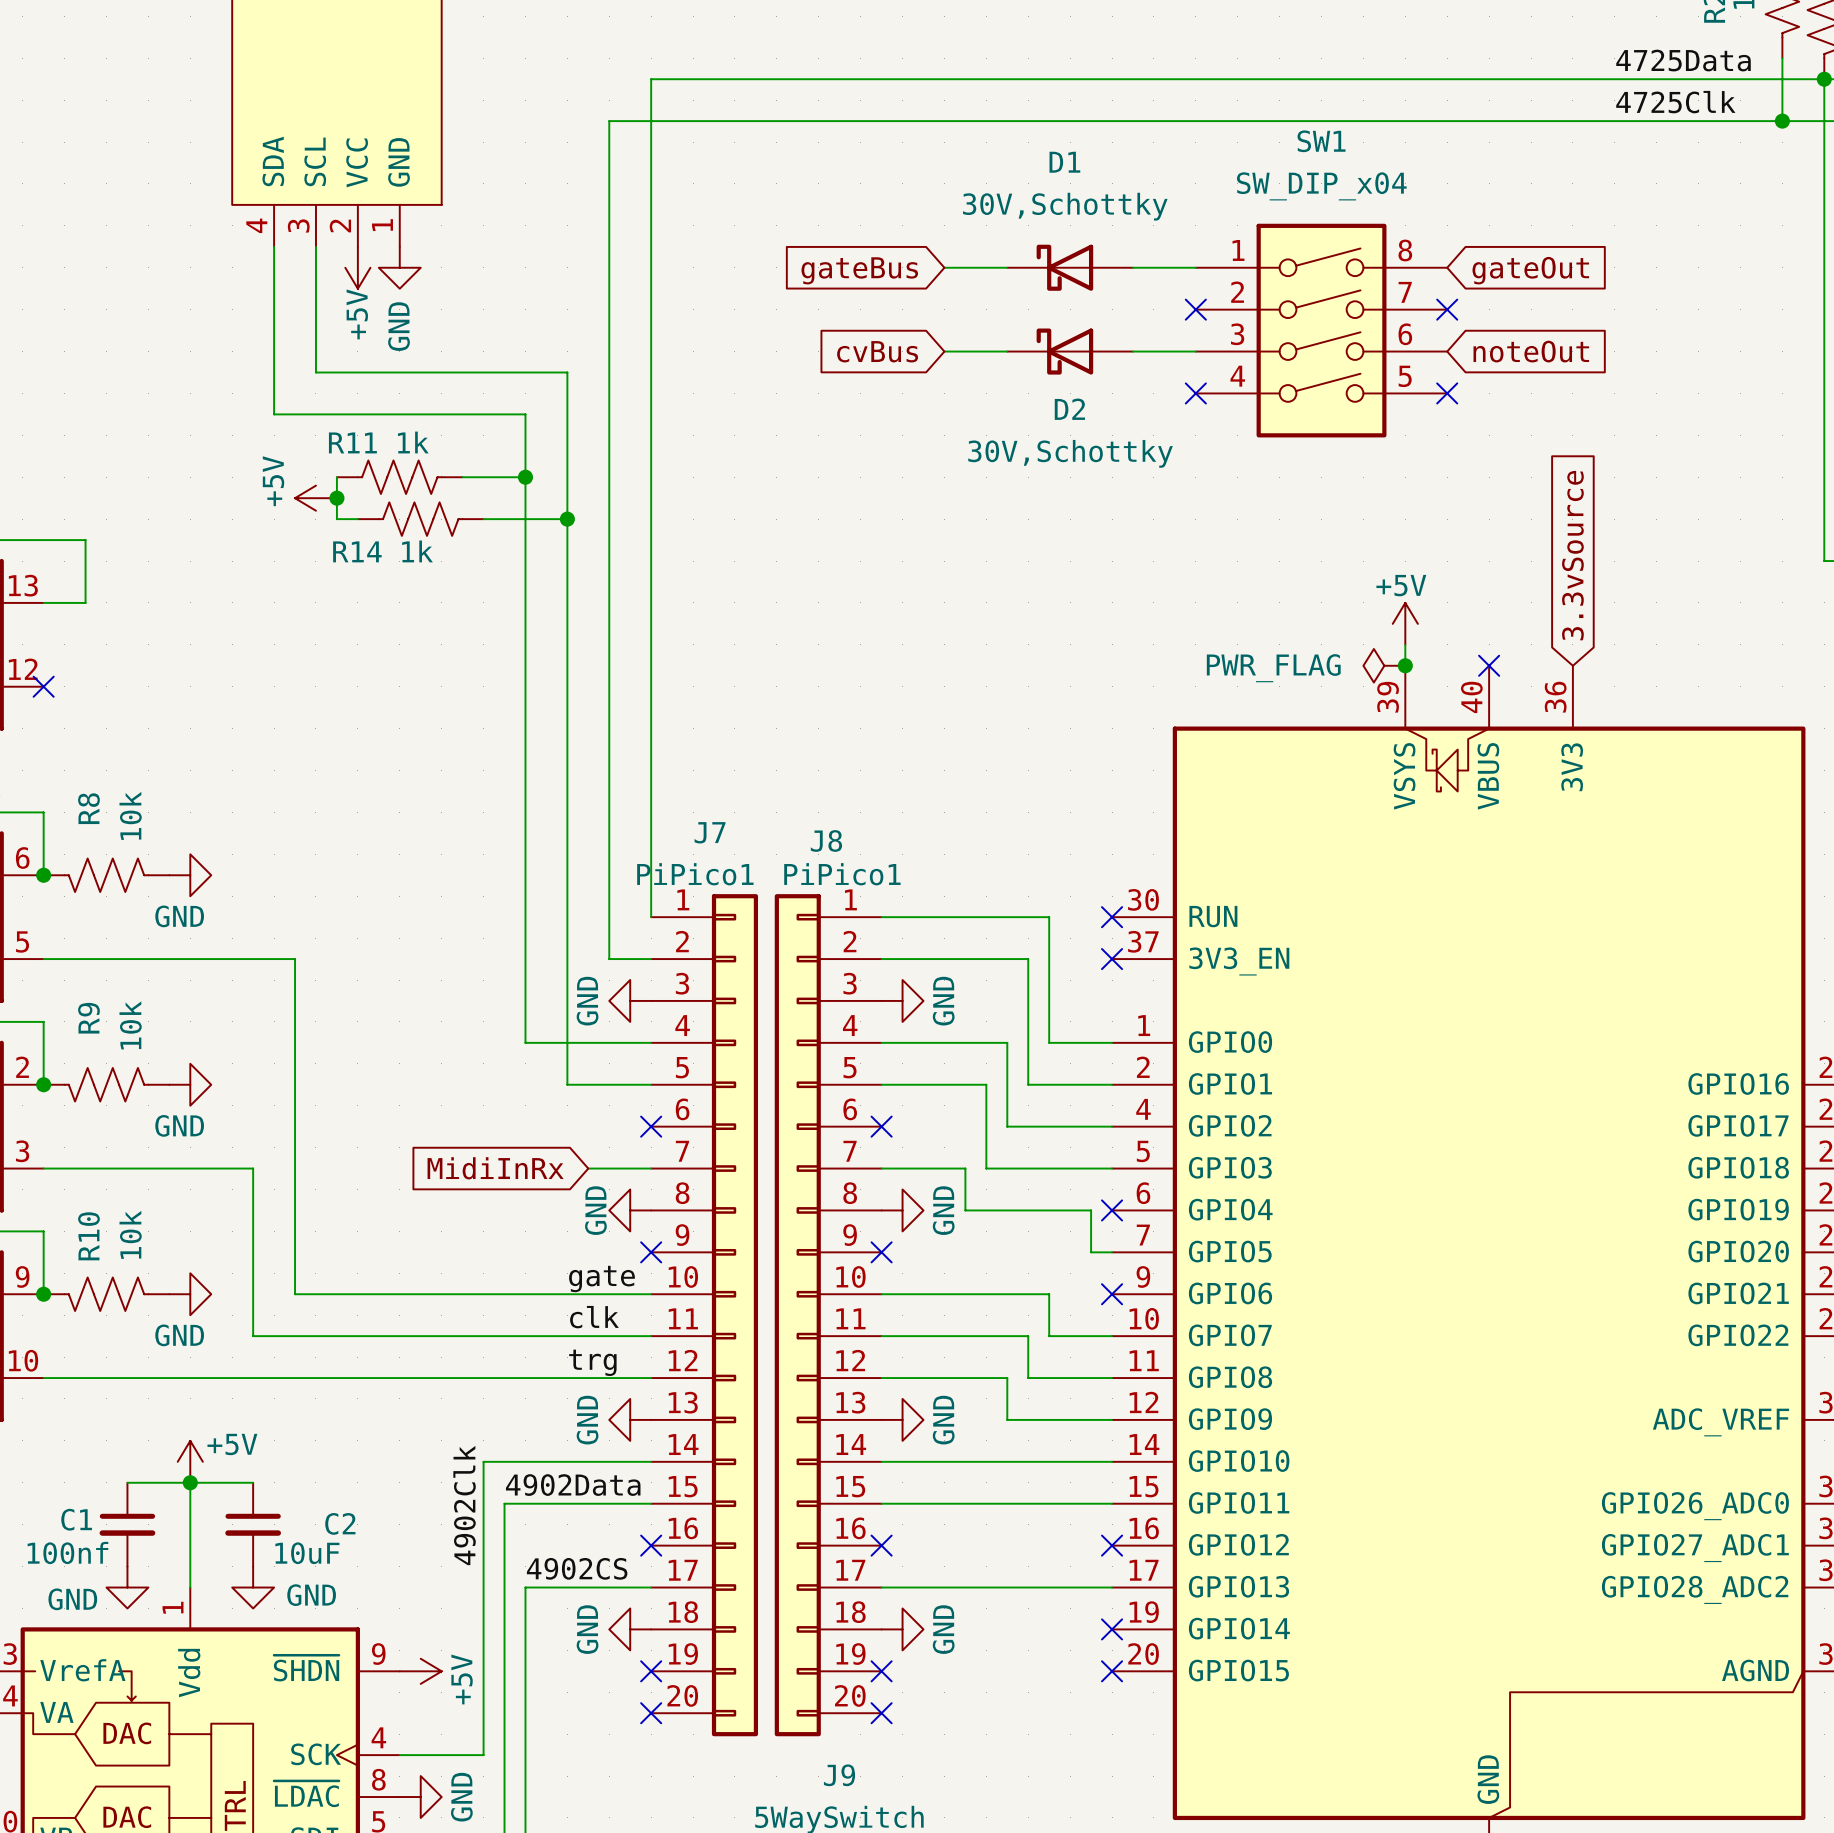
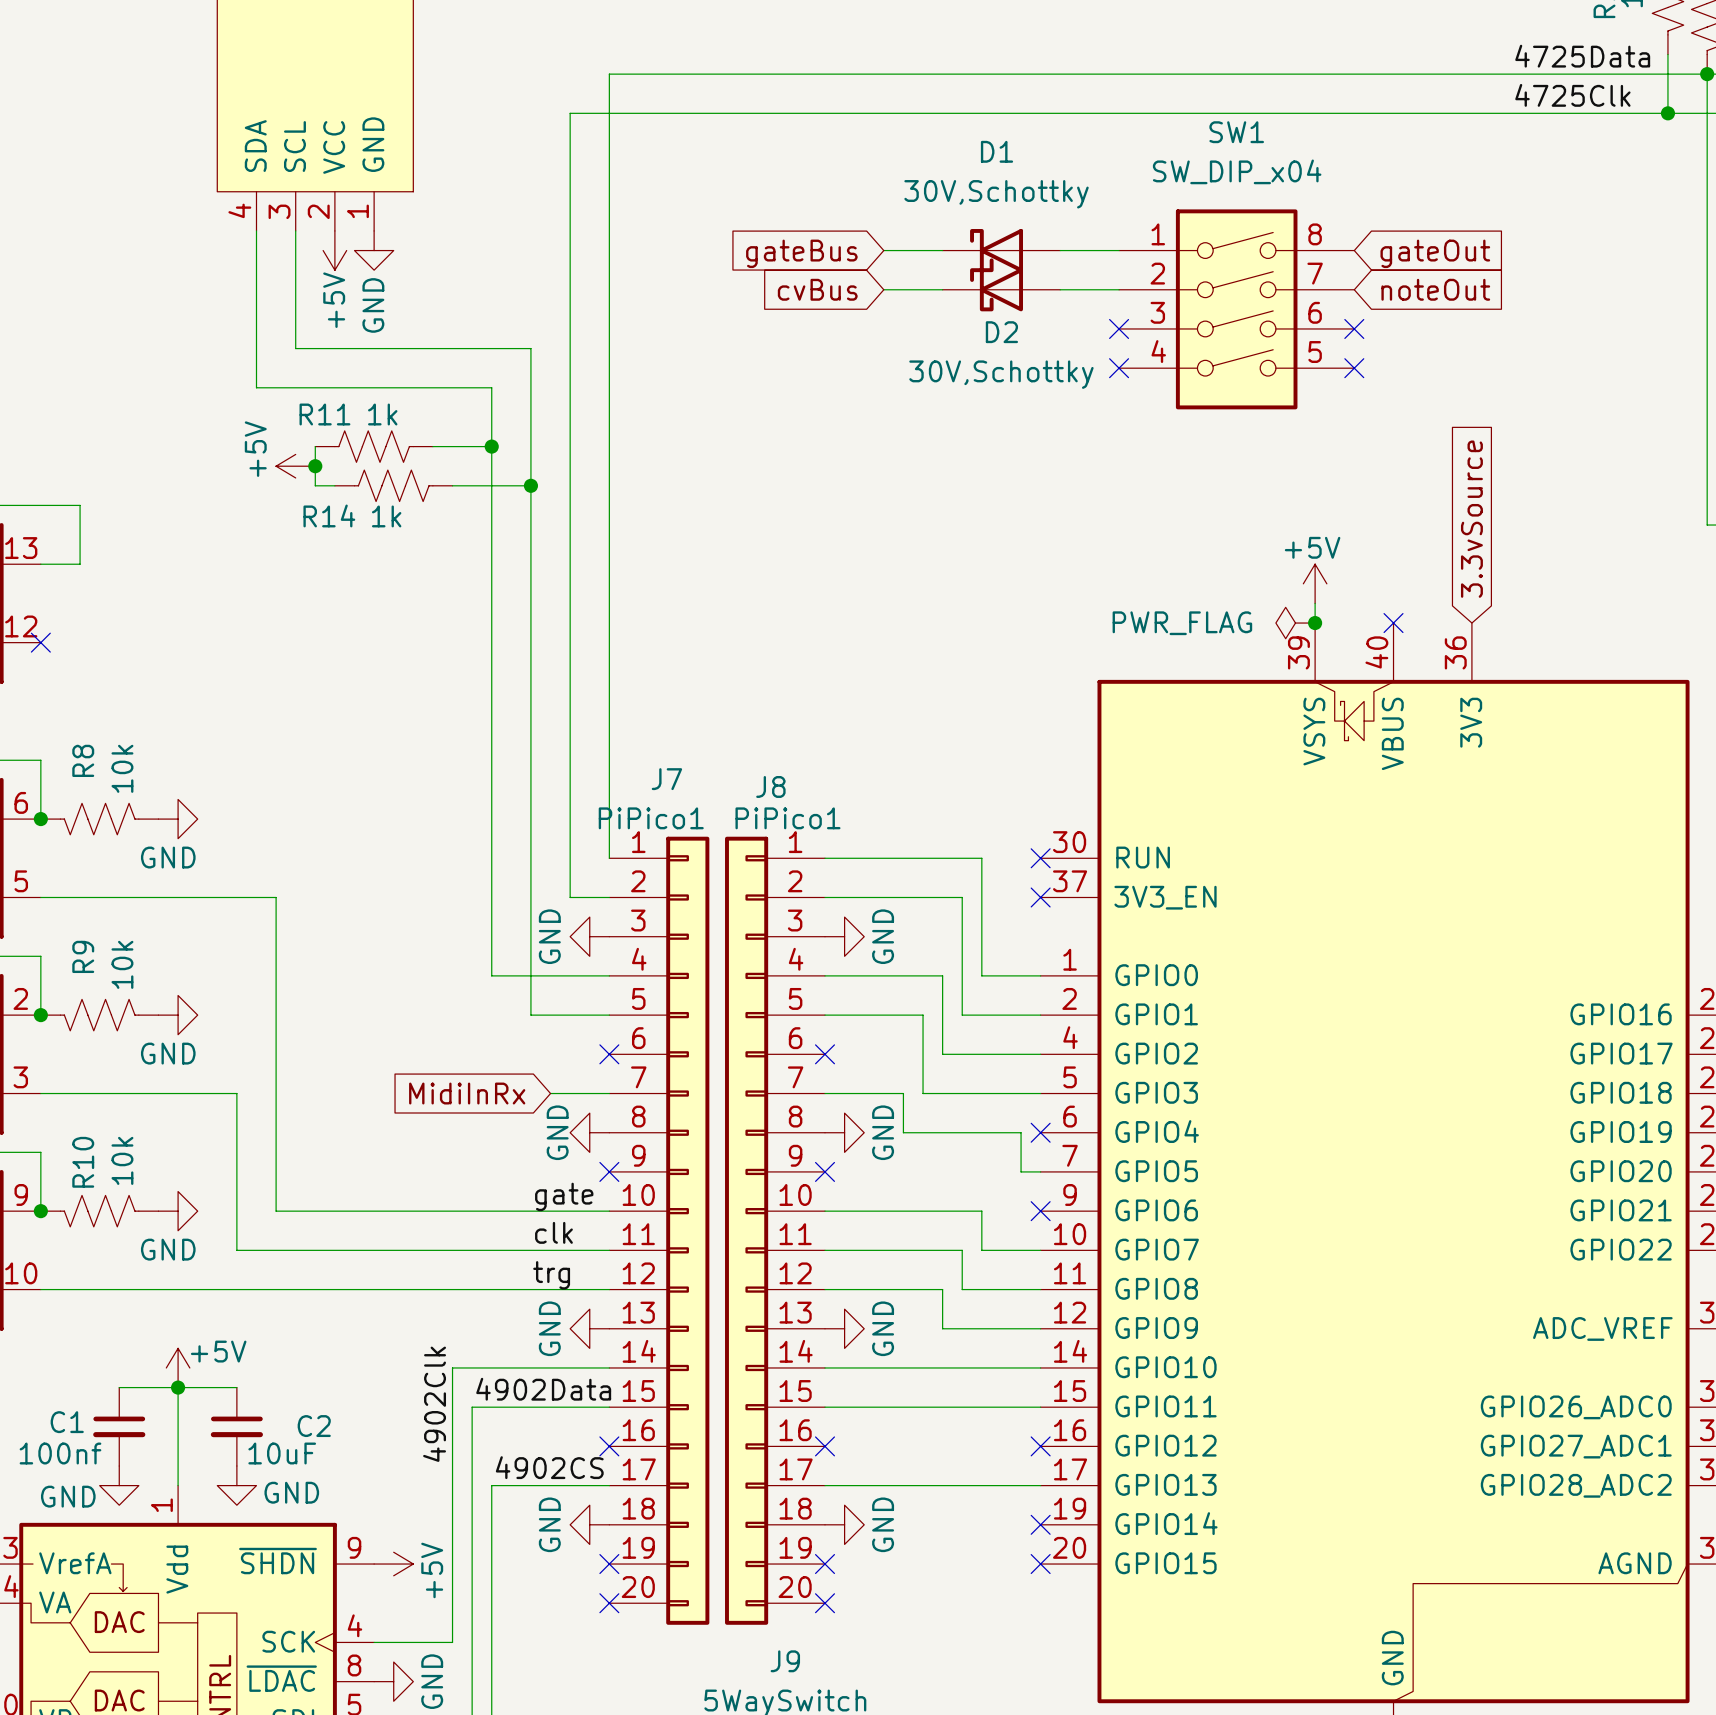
no-connect mark position: (1195, 309) -> (1119, 328)
no-connect mark position: (1447, 309) -> (1354, 328)
global label position: cvBus (877, 351) -> cvBus (817, 289)
wire: (944, 351) (1007, 351) -> (883, 289) (942, 289)
D2 position: (1070, 351) -> (1001, 289)
wire: (1132, 351) (1195, 351) -> (1060, 289) (1119, 289)
global label position: noteOut (1531, 351) -> noteOut (1435, 289)
D2 name position: D2 (1069, 409) -> D2 (1001, 332)
D2 value position: 30V,Schottky (1070, 453) -> 30V,Schottky (1001, 374)

